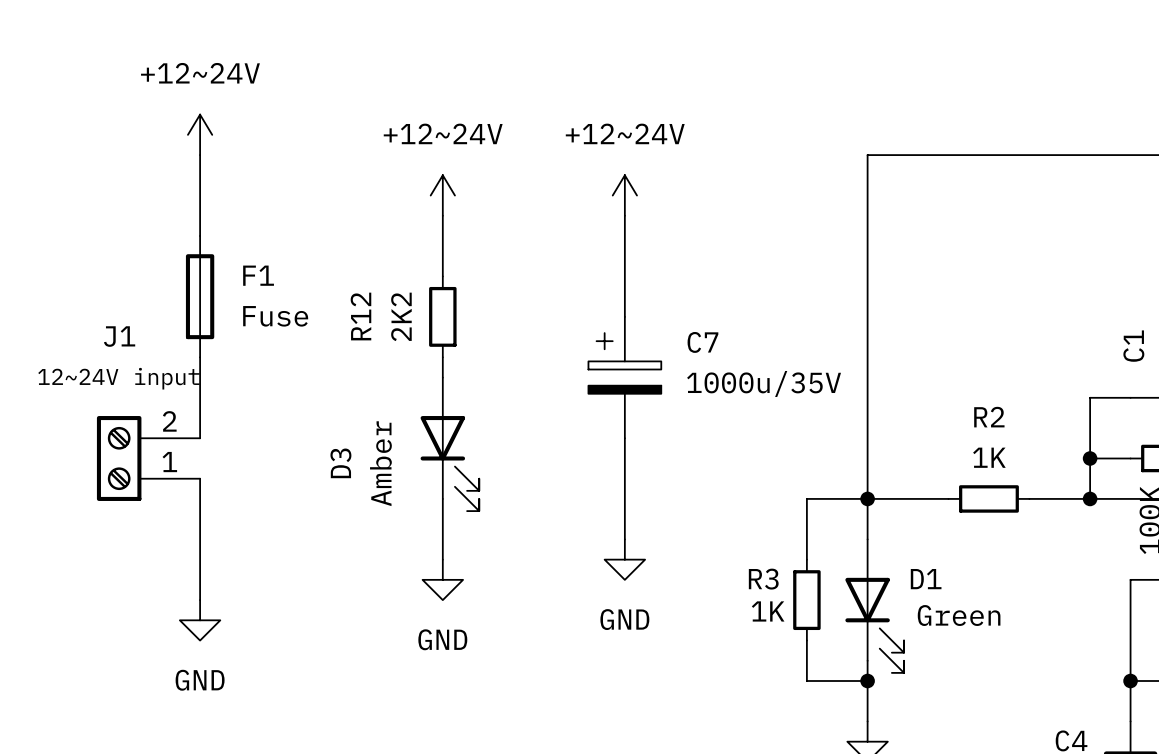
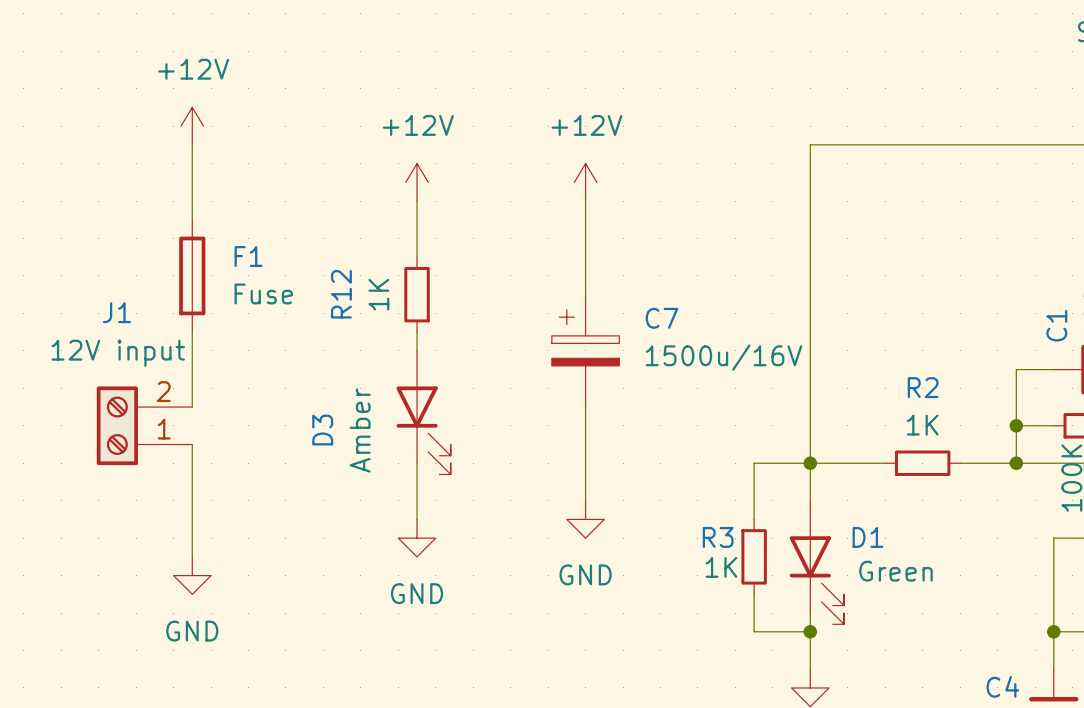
power symbol: +12~24V (200, 134) -> +12V (192, 126)
power symbol: +12~24V (442, 195) -> +12V (417, 182)
power symbol: +12~24V (624, 195) -> +12V (585, 182)
R12 value: 2K2 (401, 316) -> 1K (378, 294)
J1 value: 12~24V input (118, 378) -> 12V input (118, 353)
C7 value: 1000u/35V (764, 383) -> 1500u/16V (723, 357)

